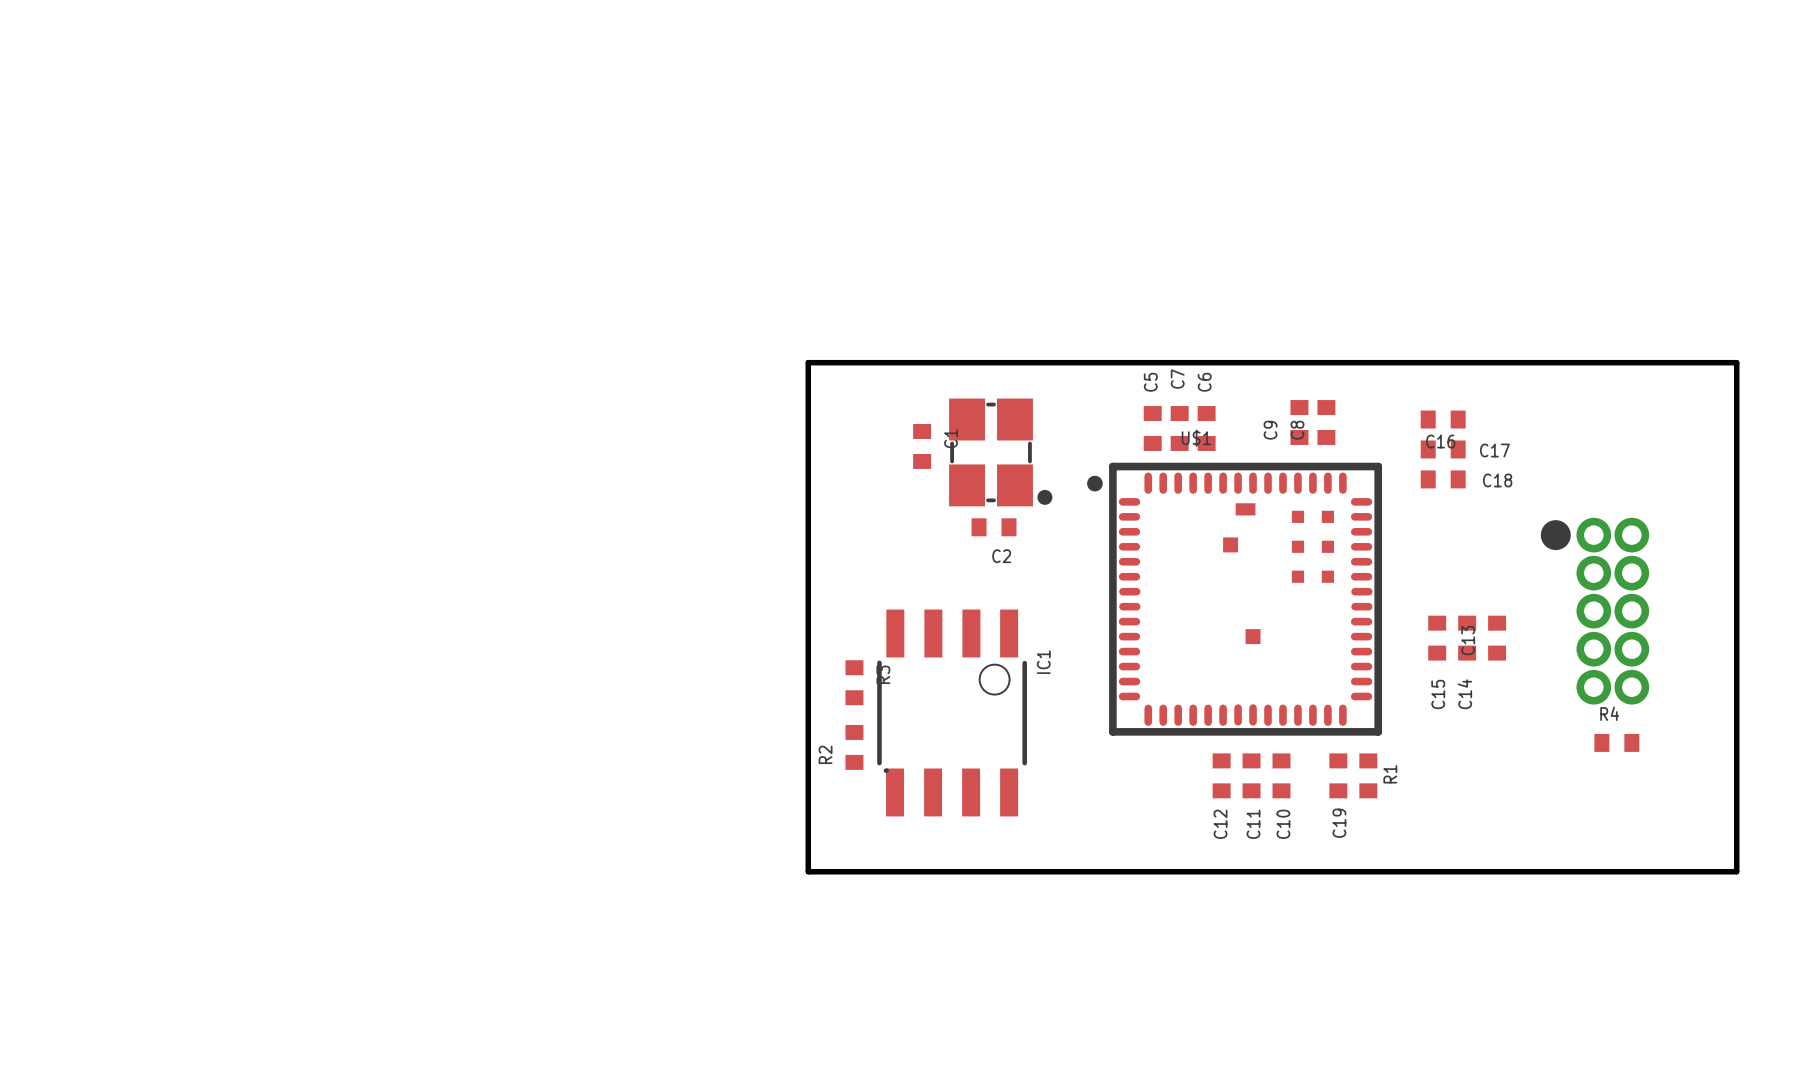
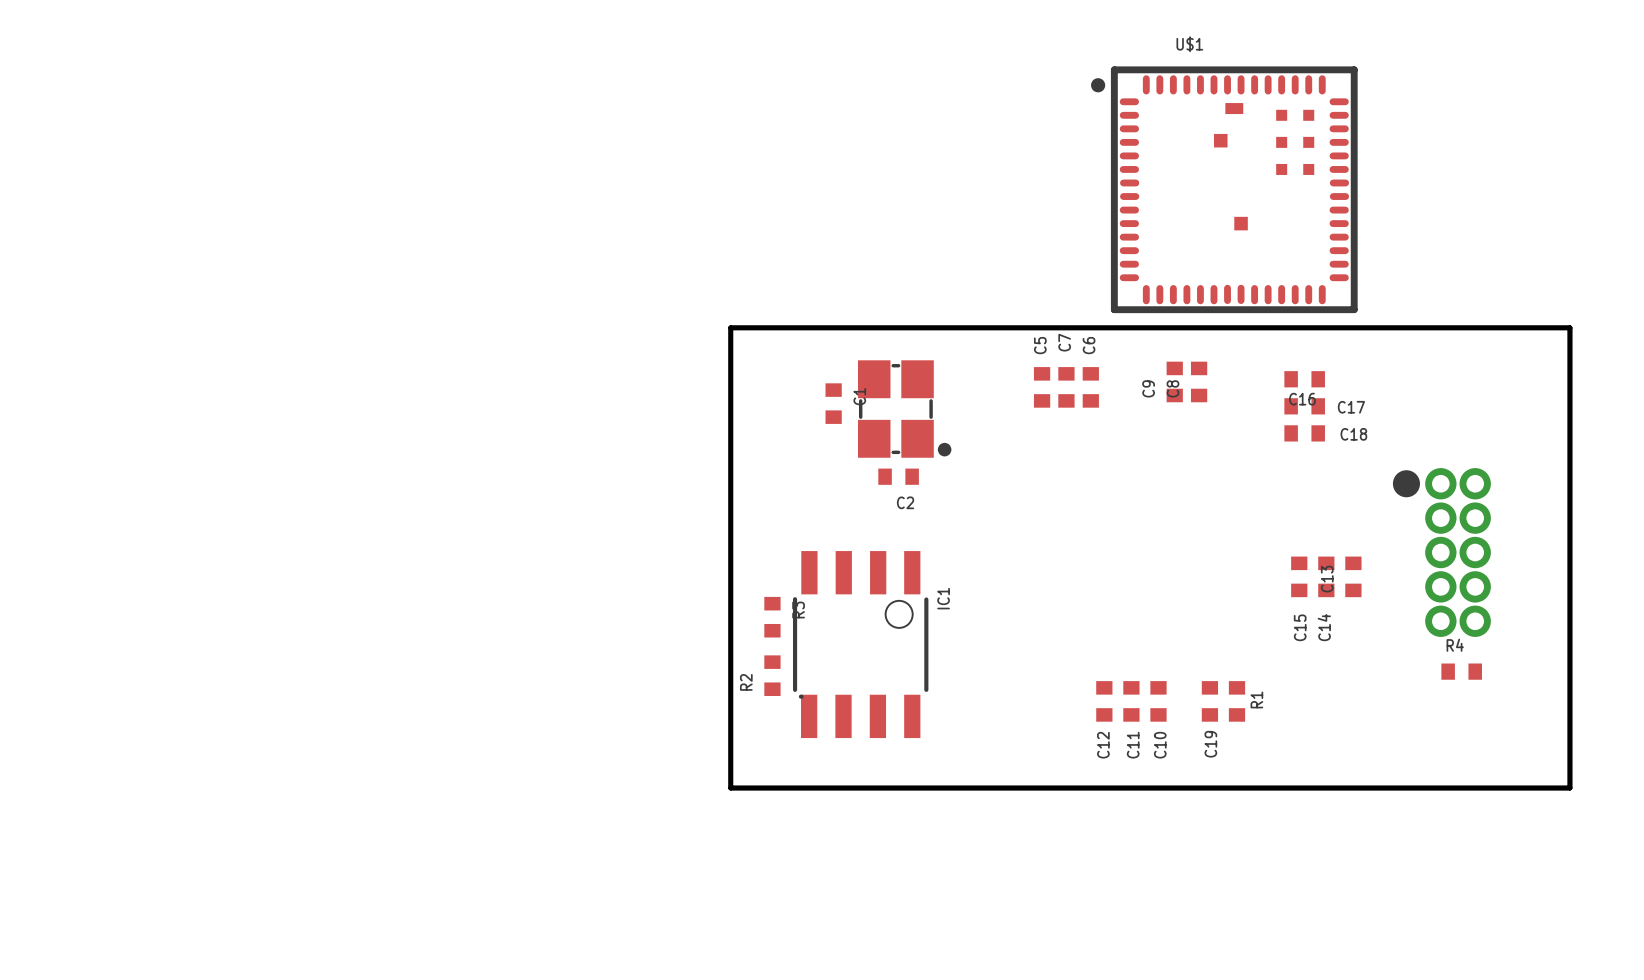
U$1 position: (1234, 599) -> (1224, 189)

